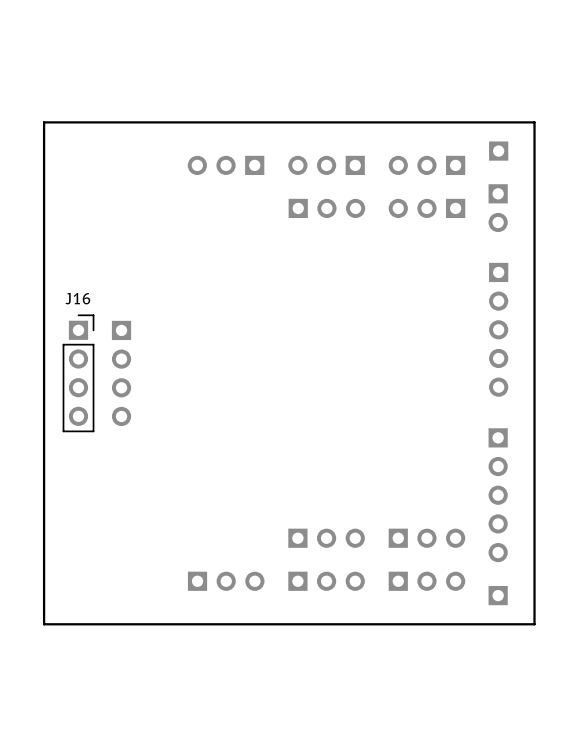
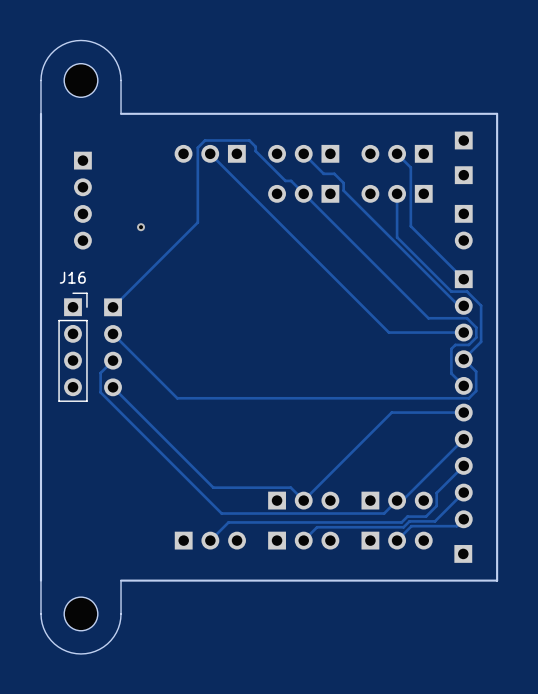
part: none -> (81, 80)
board edge: (130, 122) (44, 122) -> (121, 113) (120, 75) (116, 61) (107, 50) (99, 45) (81, 40) (62, 45) (51, 53) (45, 61) (41, 75) (41, 113)
track: none -> (210, 153) (388, 332) (463, 332)
track: none -> (303, 153) (323, 173) (334, 173) (343, 183) (343, 190) (458, 305) (463, 305)
track: none -> (397, 153) (410, 167) (410, 226) (463, 279)
part: none -> (463, 175)
part rotation: 0° (326, 208) -> 180° (303, 193)
track: none -> (397, 193) (397, 237) (451, 291) (467, 291) (481, 305) (481, 341) (463, 359) (476, 371) (476, 391) (468, 398) (177, 398) (113, 333)
part position: (498, 208) -> (463, 227)
part: none -> (82, 200)
via: none -> (141, 227)
part: (498, 329) -> none
track: none -> (113, 307) (197, 222) (197, 147) (205, 140) (249, 140) (255, 146) (255, 151) (285, 180) (291, 180) (428, 318) (467, 318) (476, 327) (476, 337) (468, 344) (455, 344) (451, 348) (451, 373) (463, 385)
track: none -> (113, 360) (100, 373) (100, 392) (221, 513) (384, 513) (397, 500) (402, 500) (463, 439)
track: none -> (113, 387) (213, 487) (290, 487) (303, 500) (391, 412) (463, 412)
part: none -> (463, 399)
part: (498, 495) -> none
track: none -> (463, 465) (436, 492) (436, 505) (426, 516) (407, 516) (401, 522) (228, 522) (210, 540)
track: none -> (463, 492) (434, 521) (409, 521) (403, 527) (317, 527) (303, 540)
track: none -> (463, 519) (456, 526) (411, 526) (397, 540)
board edge: (130, 624) (44, 624) -> (121, 580) (120, 618) (116, 632) (110, 640) (99, 649) (81, 653) (71, 652) (58, 646) (45, 632) (41, 618) (41, 580)
part: none -> (81, 613)

